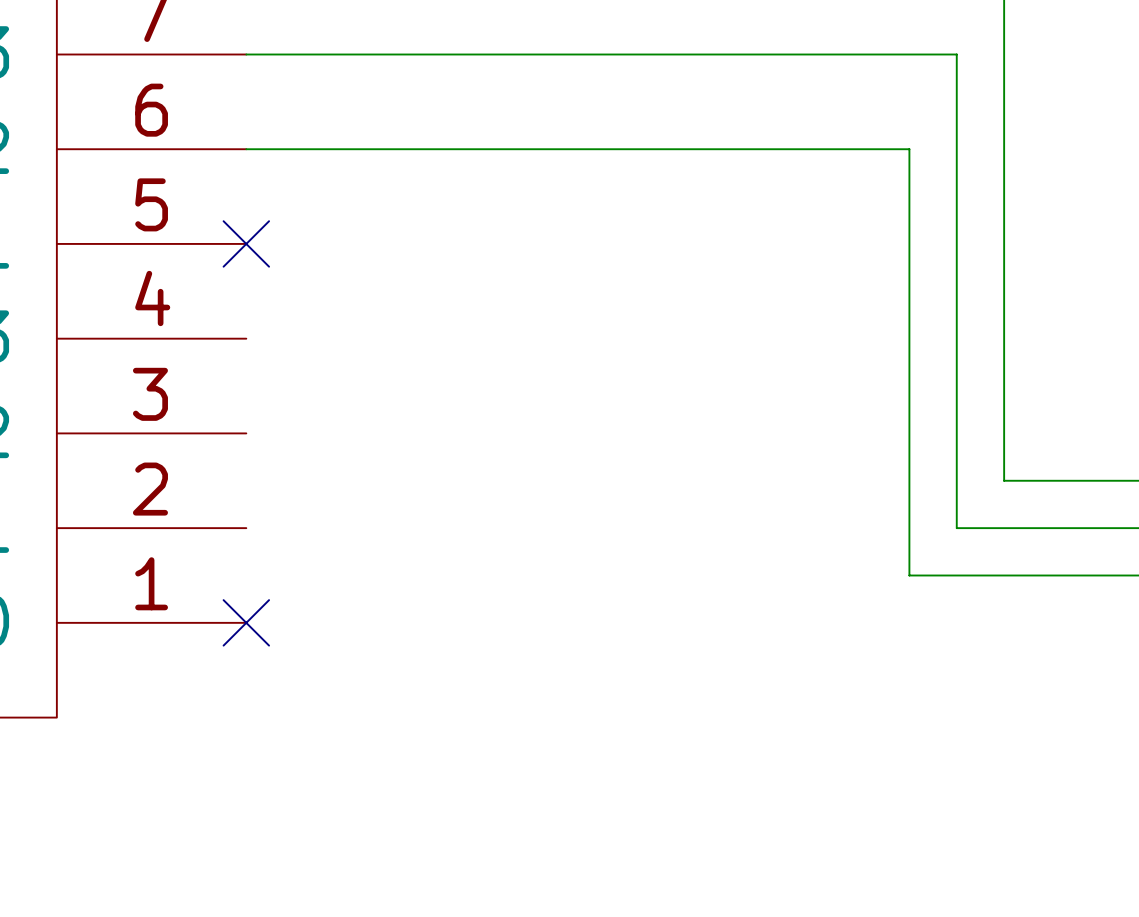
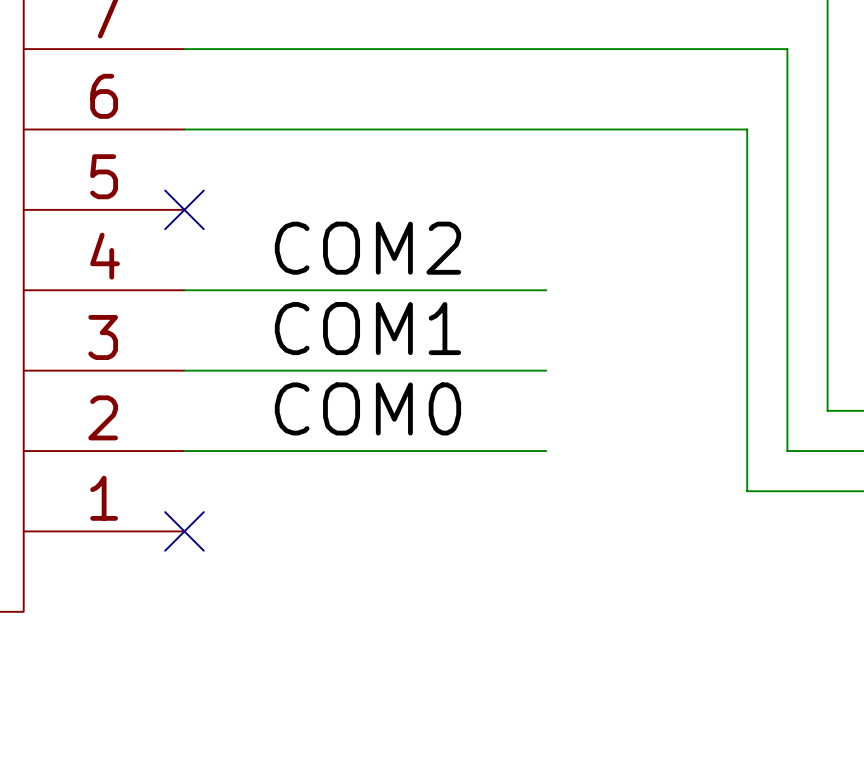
label: none -> COM2 (367, 248)
wire: none -> (184, 290) (546, 290)
label: none -> COM1 (367, 328)
wire: none -> (184, 370) (546, 370)
label: none -> COM0 (367, 408)
wire: none -> (184, 451) (546, 451)

